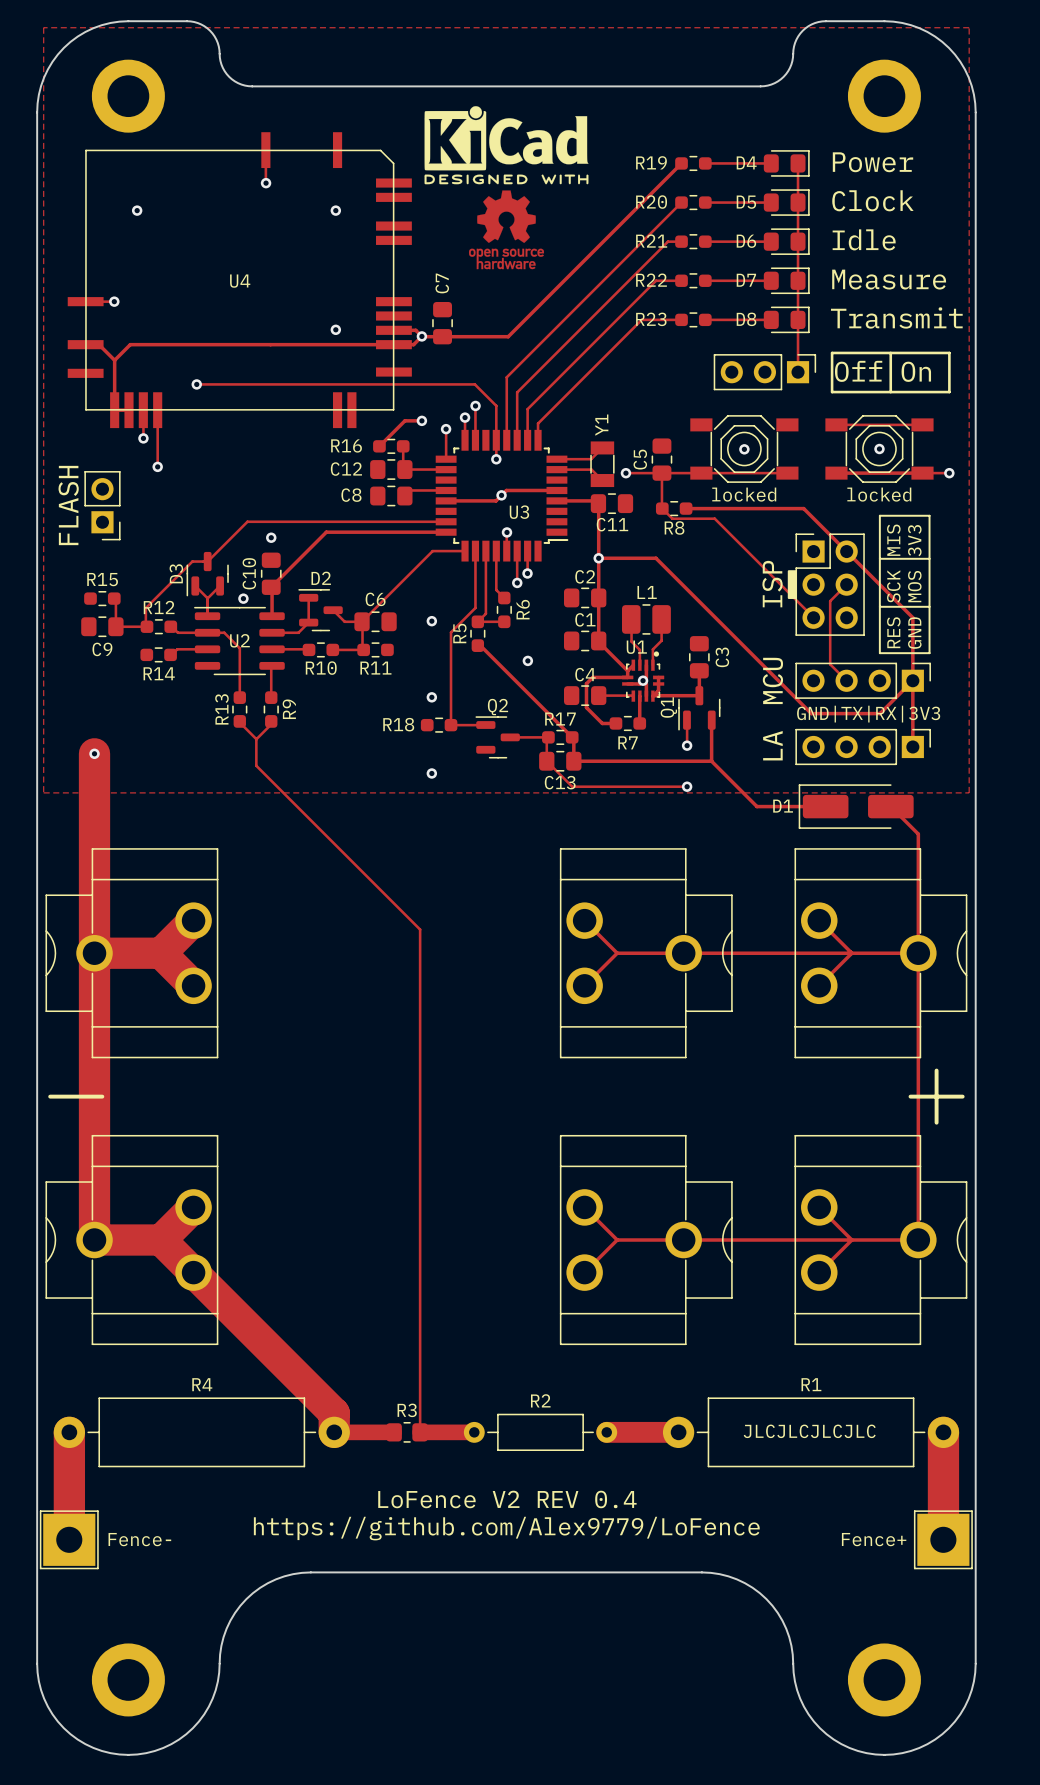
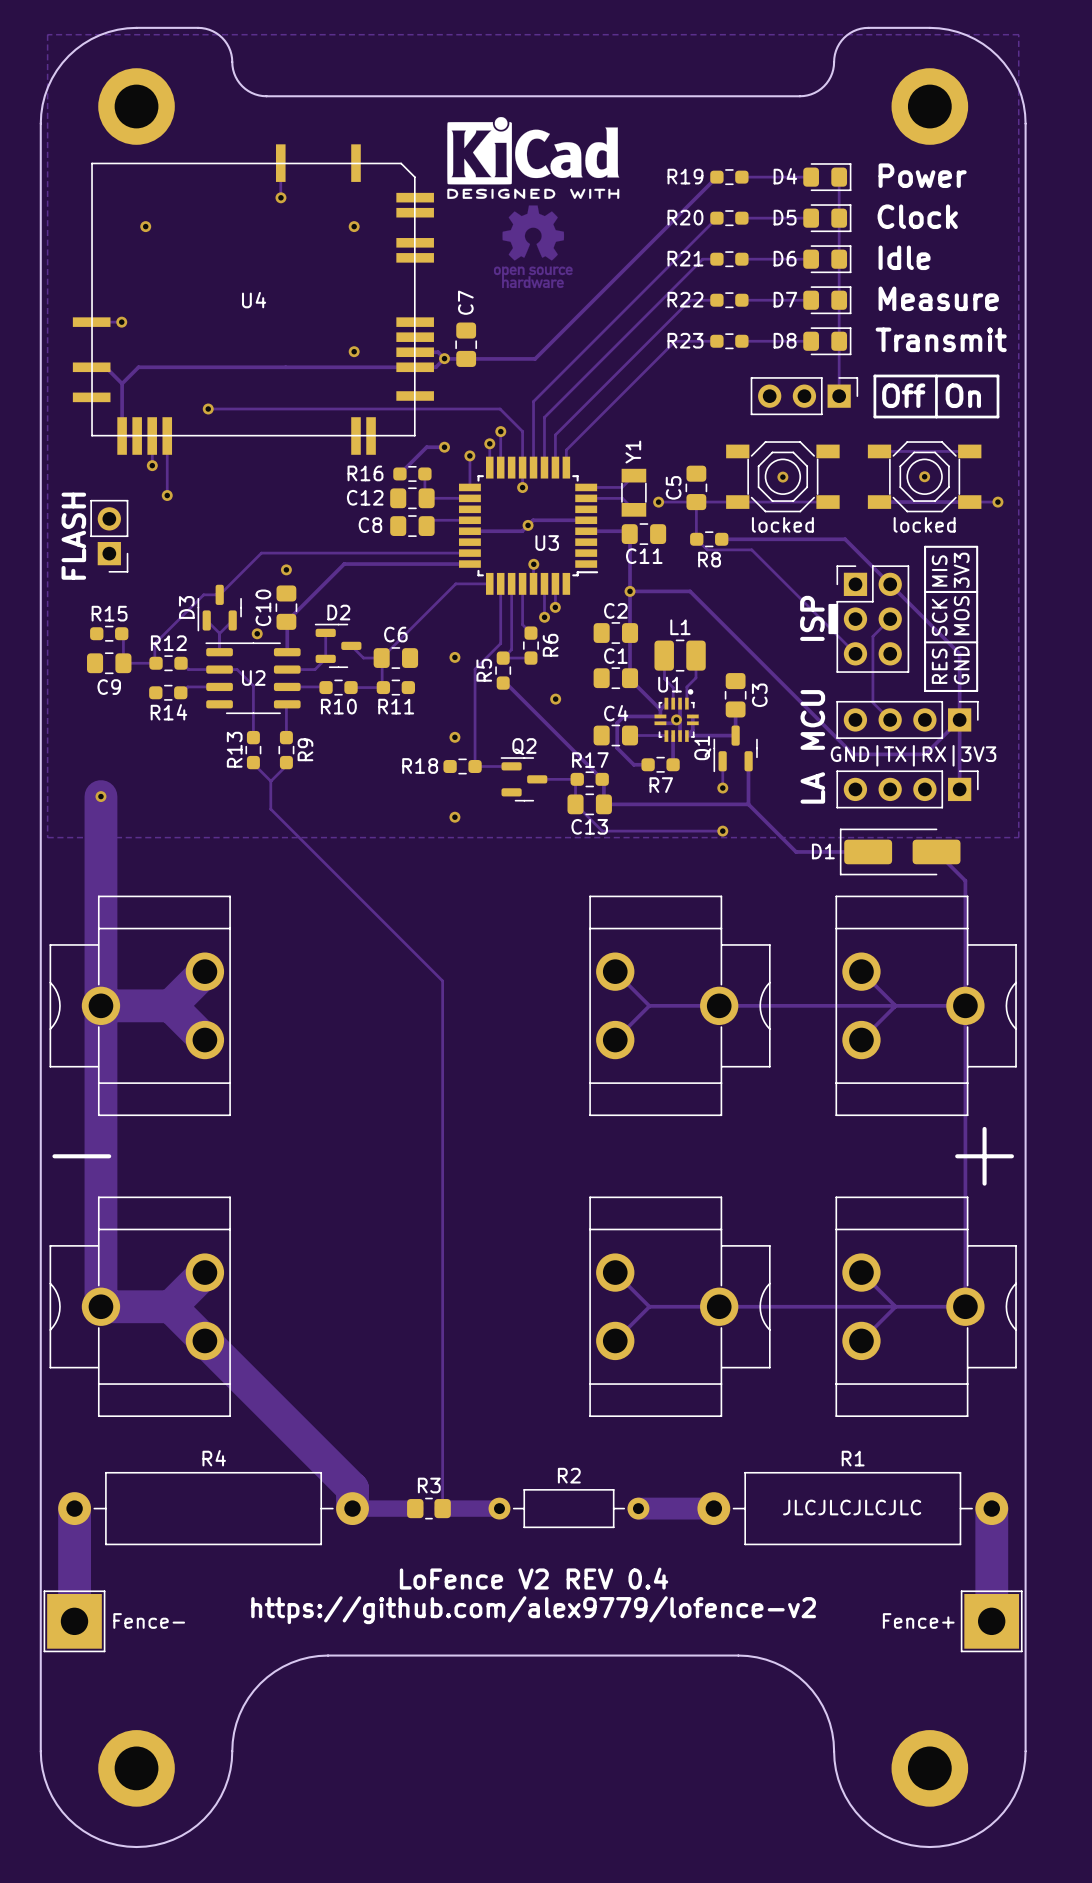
text: https://github.com/Alex9779/LoFence (506, 1528) -> https://github.com/alex9779/lofence-v2 (533, 1610)

